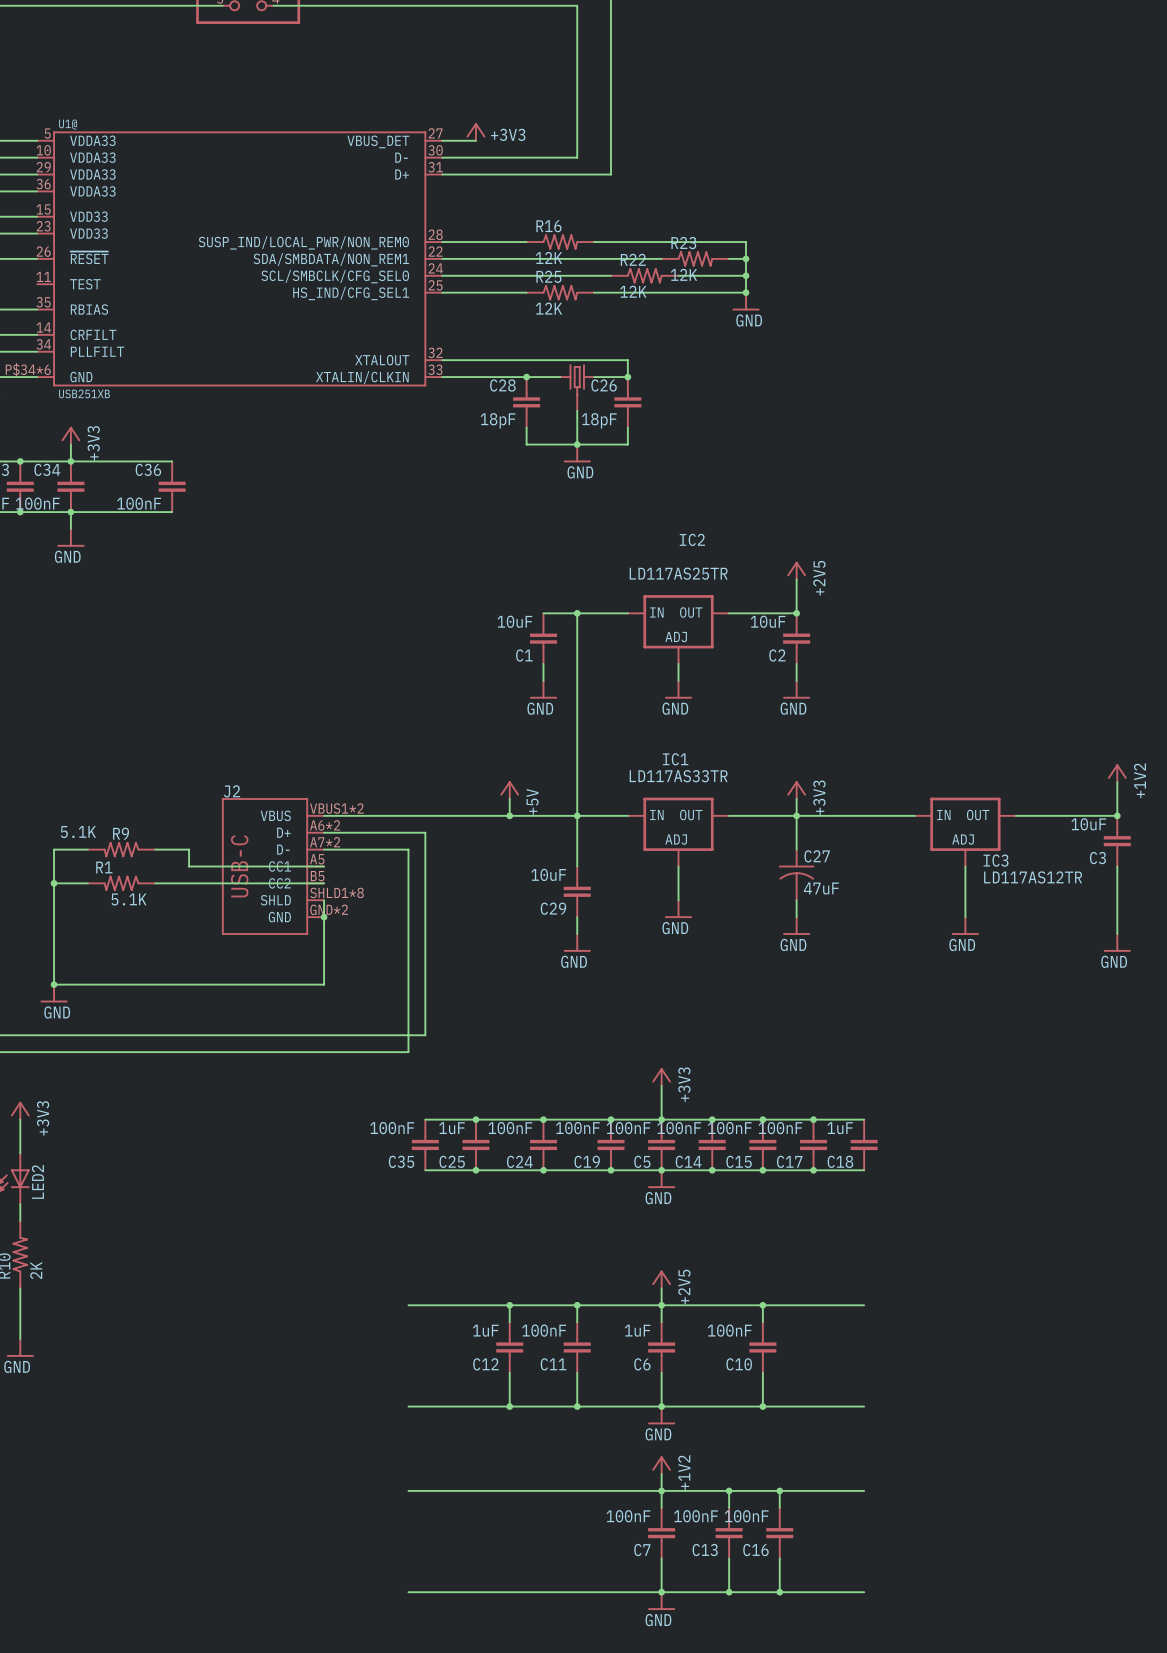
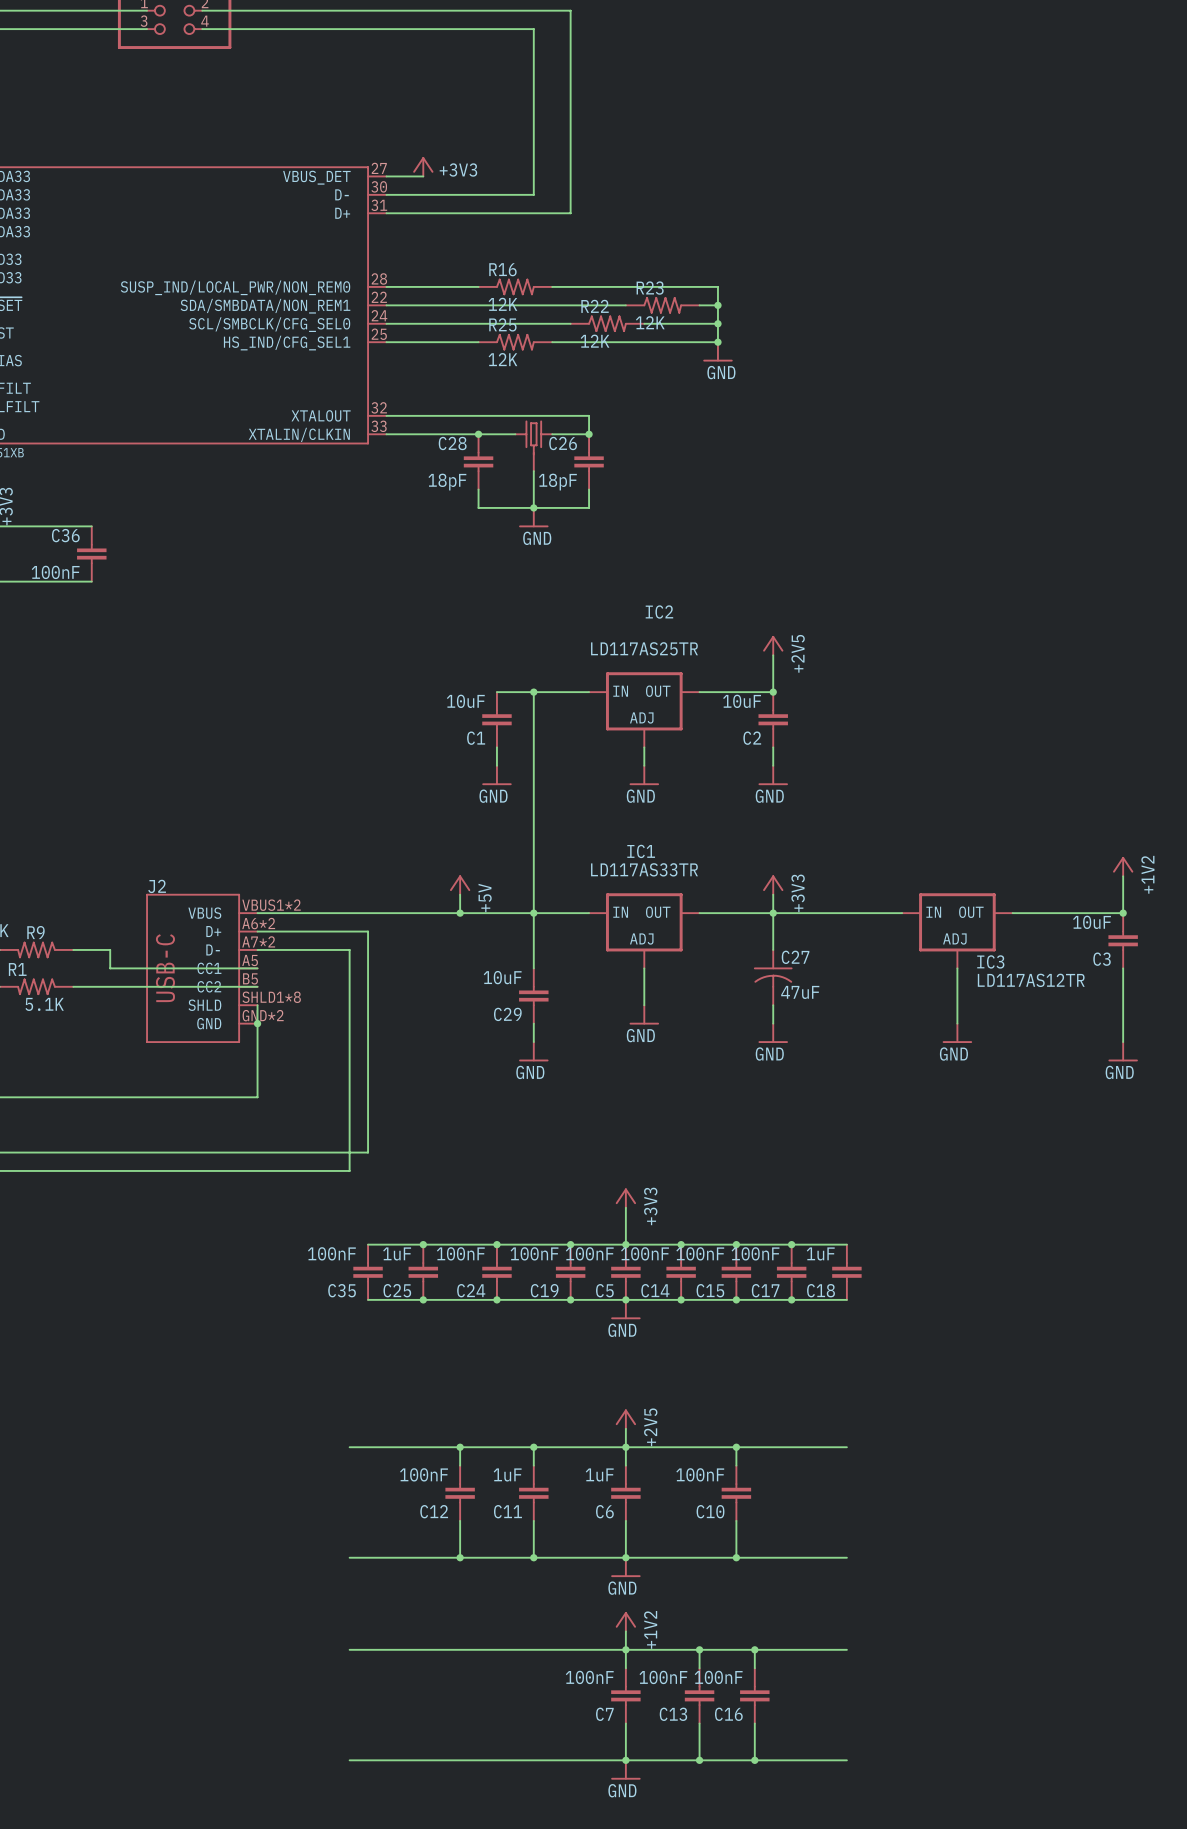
C12 value: 1uF (485, 1330) -> 100nF (424, 1474)
C11 value: 100nF (544, 1330) -> 1uF (507, 1474)

